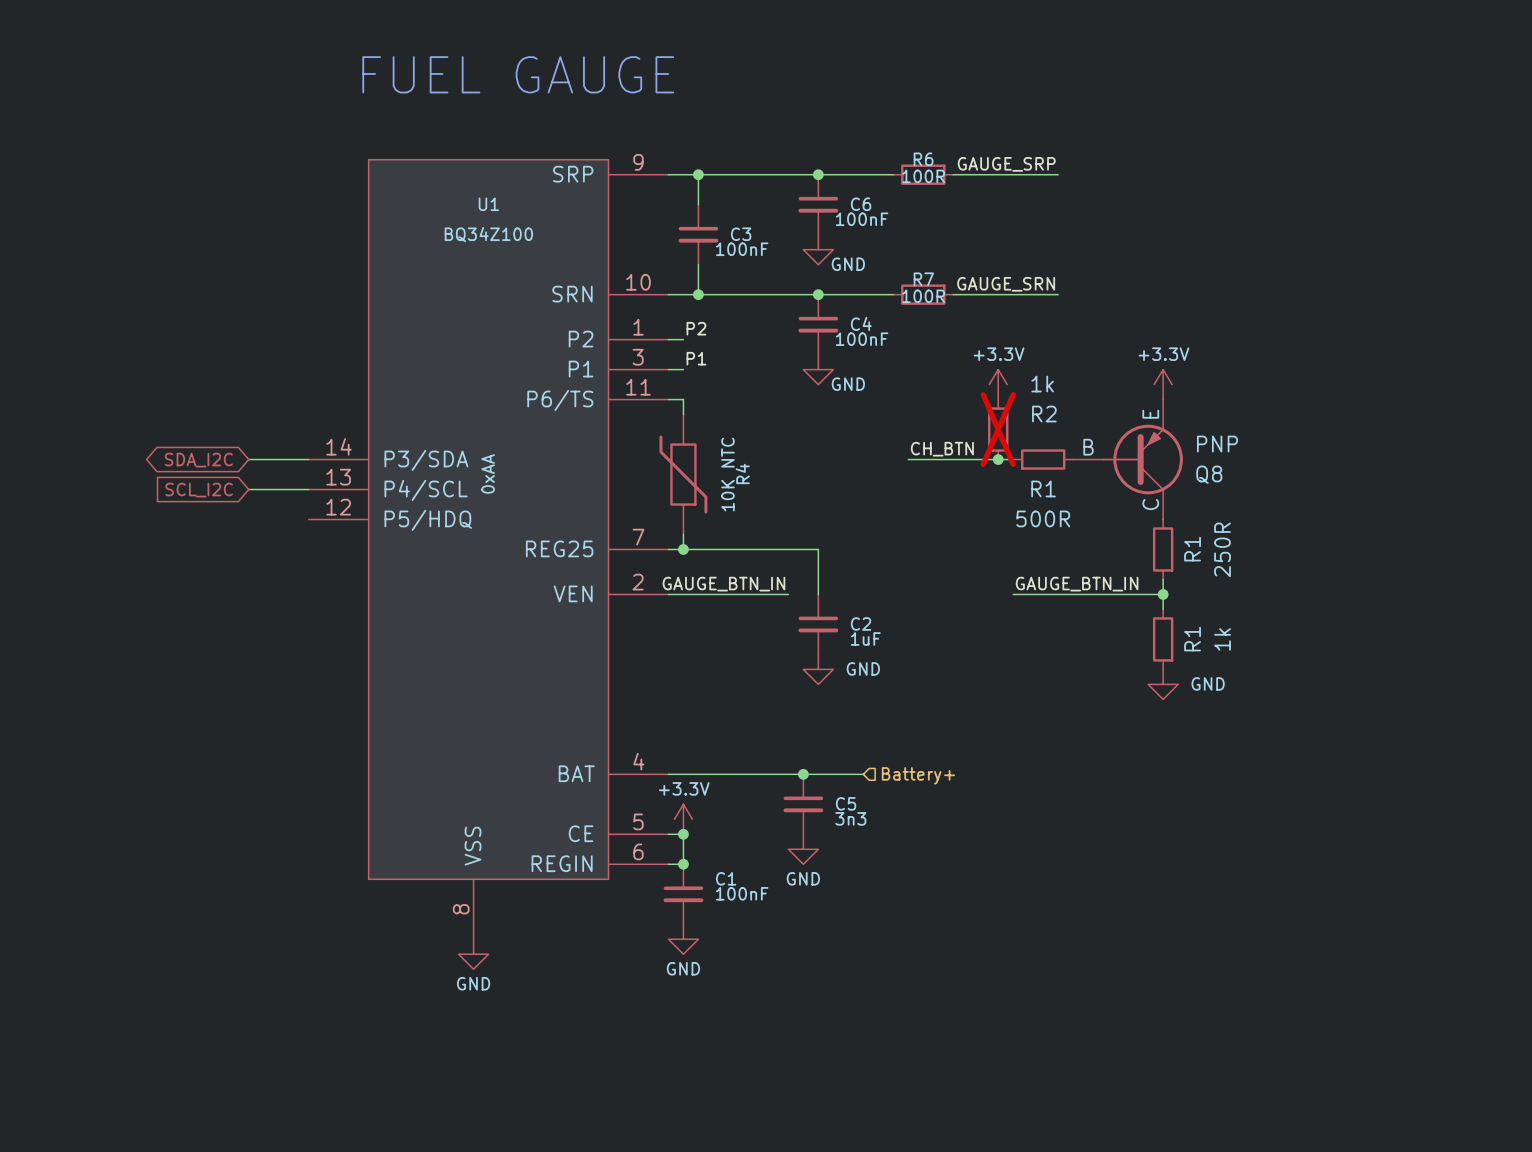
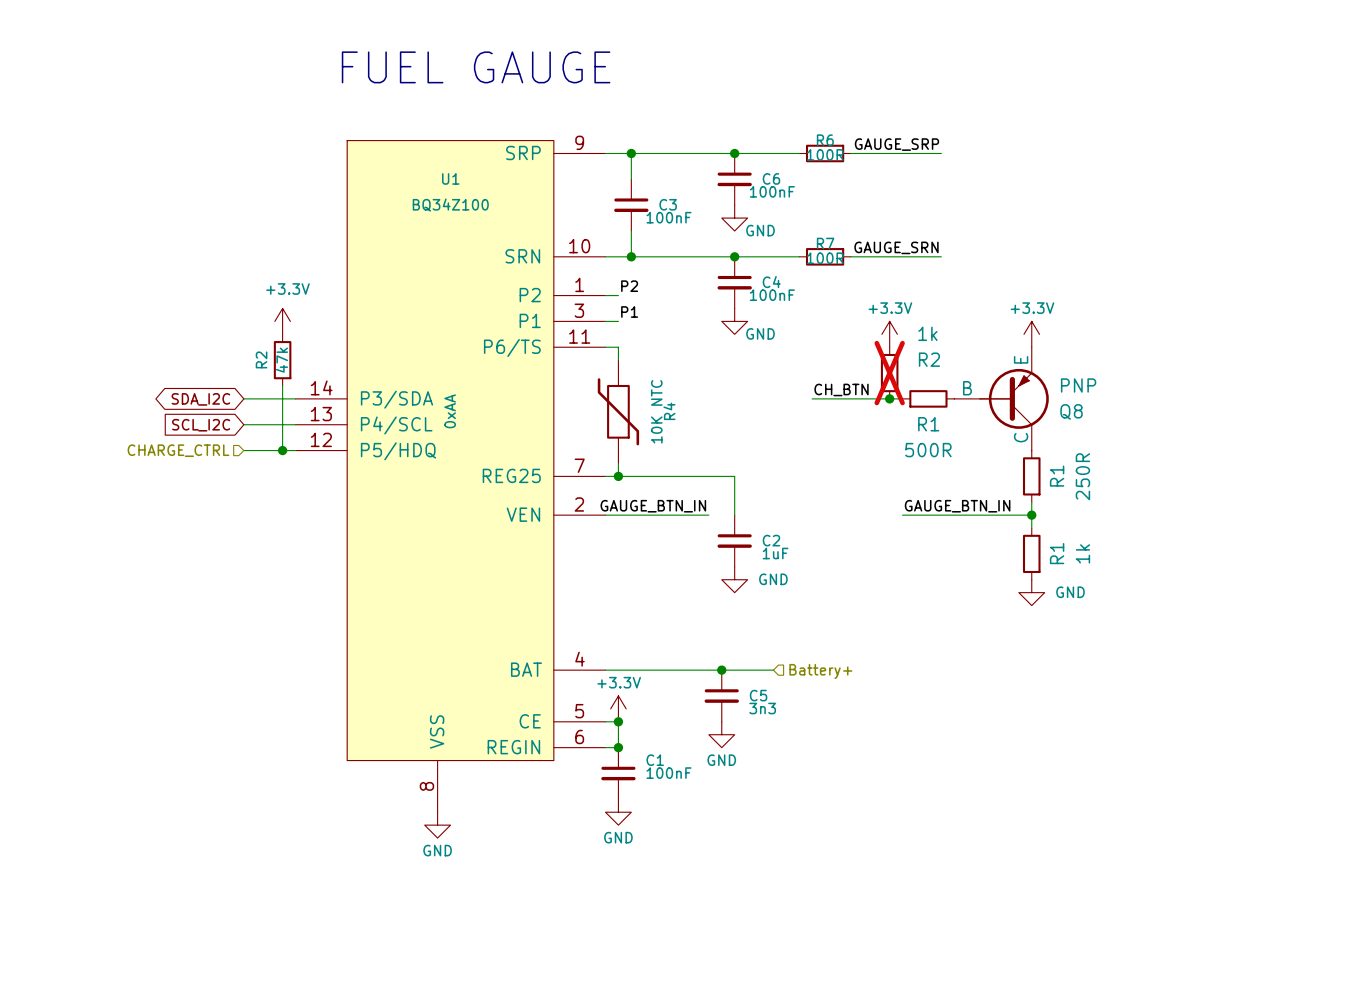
power symbol: none -> +3.3V (282, 321)
R2: none -> 47k (282, 360)
wire: none -> (282, 385) (282, 450)
hierarchical label: none -> CHARGE_CTRL (178, 450)
wire: none -> (243, 450) (295, 450)
junction: none -> (282, 450)

